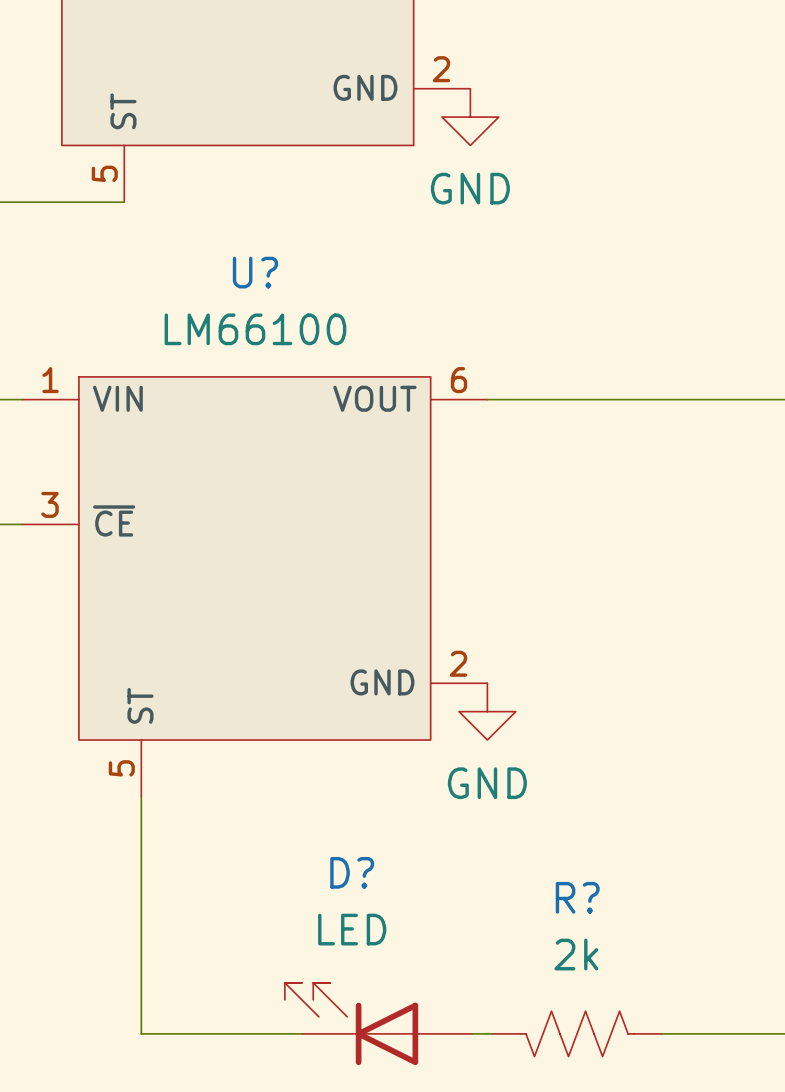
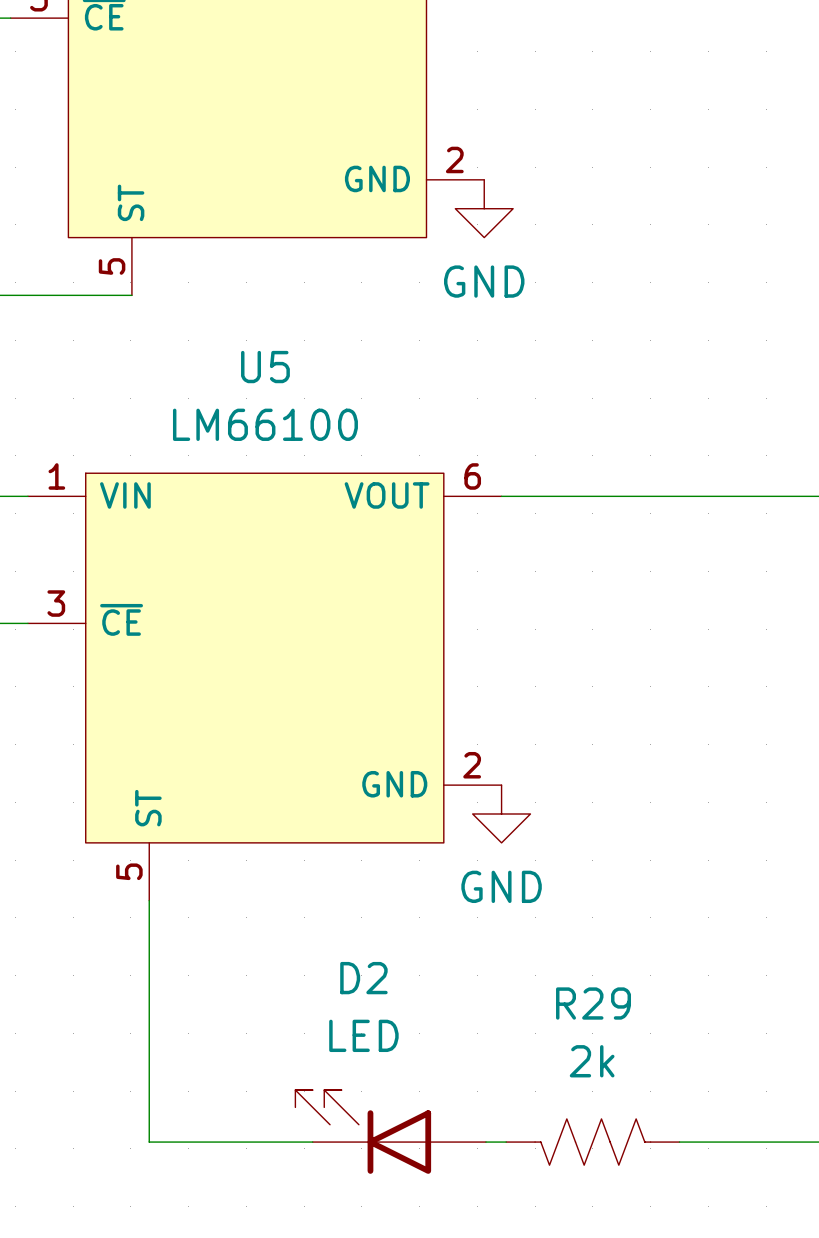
U? name: U? (255, 272) -> U5 (265, 367)
D? name: D? (352, 872) -> D2 (363, 978)
R? name: R? (577, 897) -> R29 (593, 1003)

